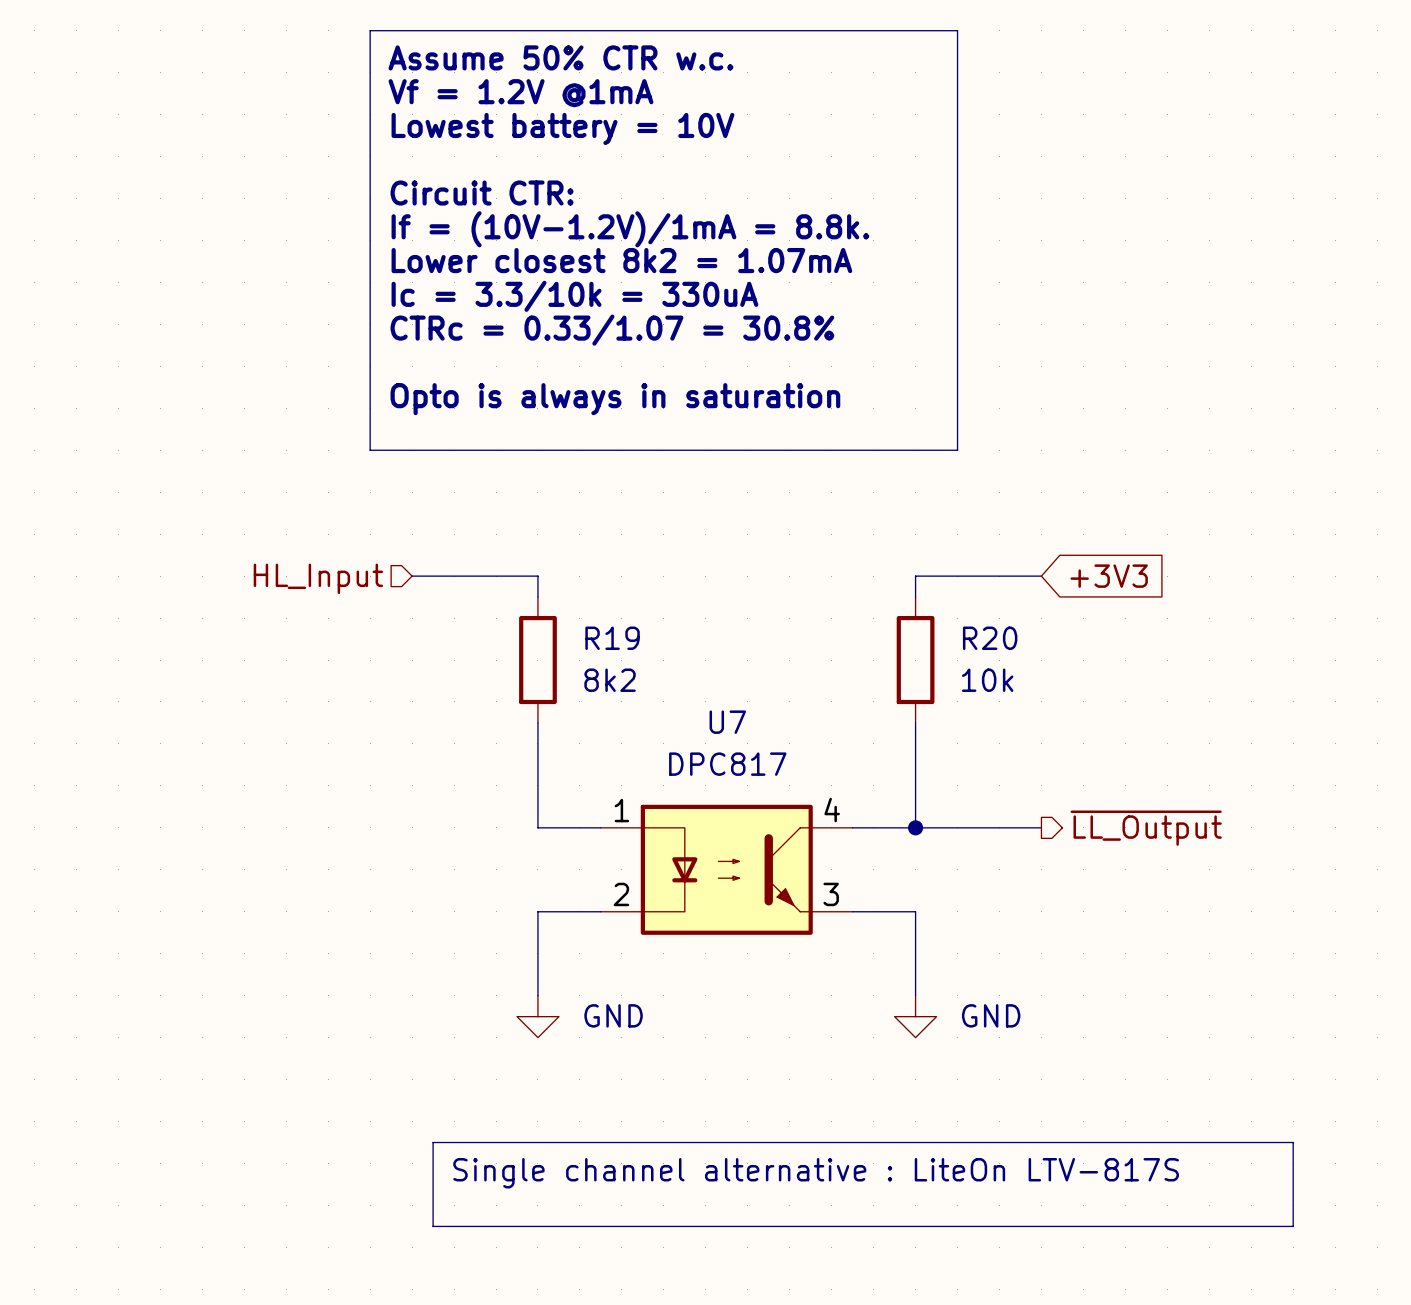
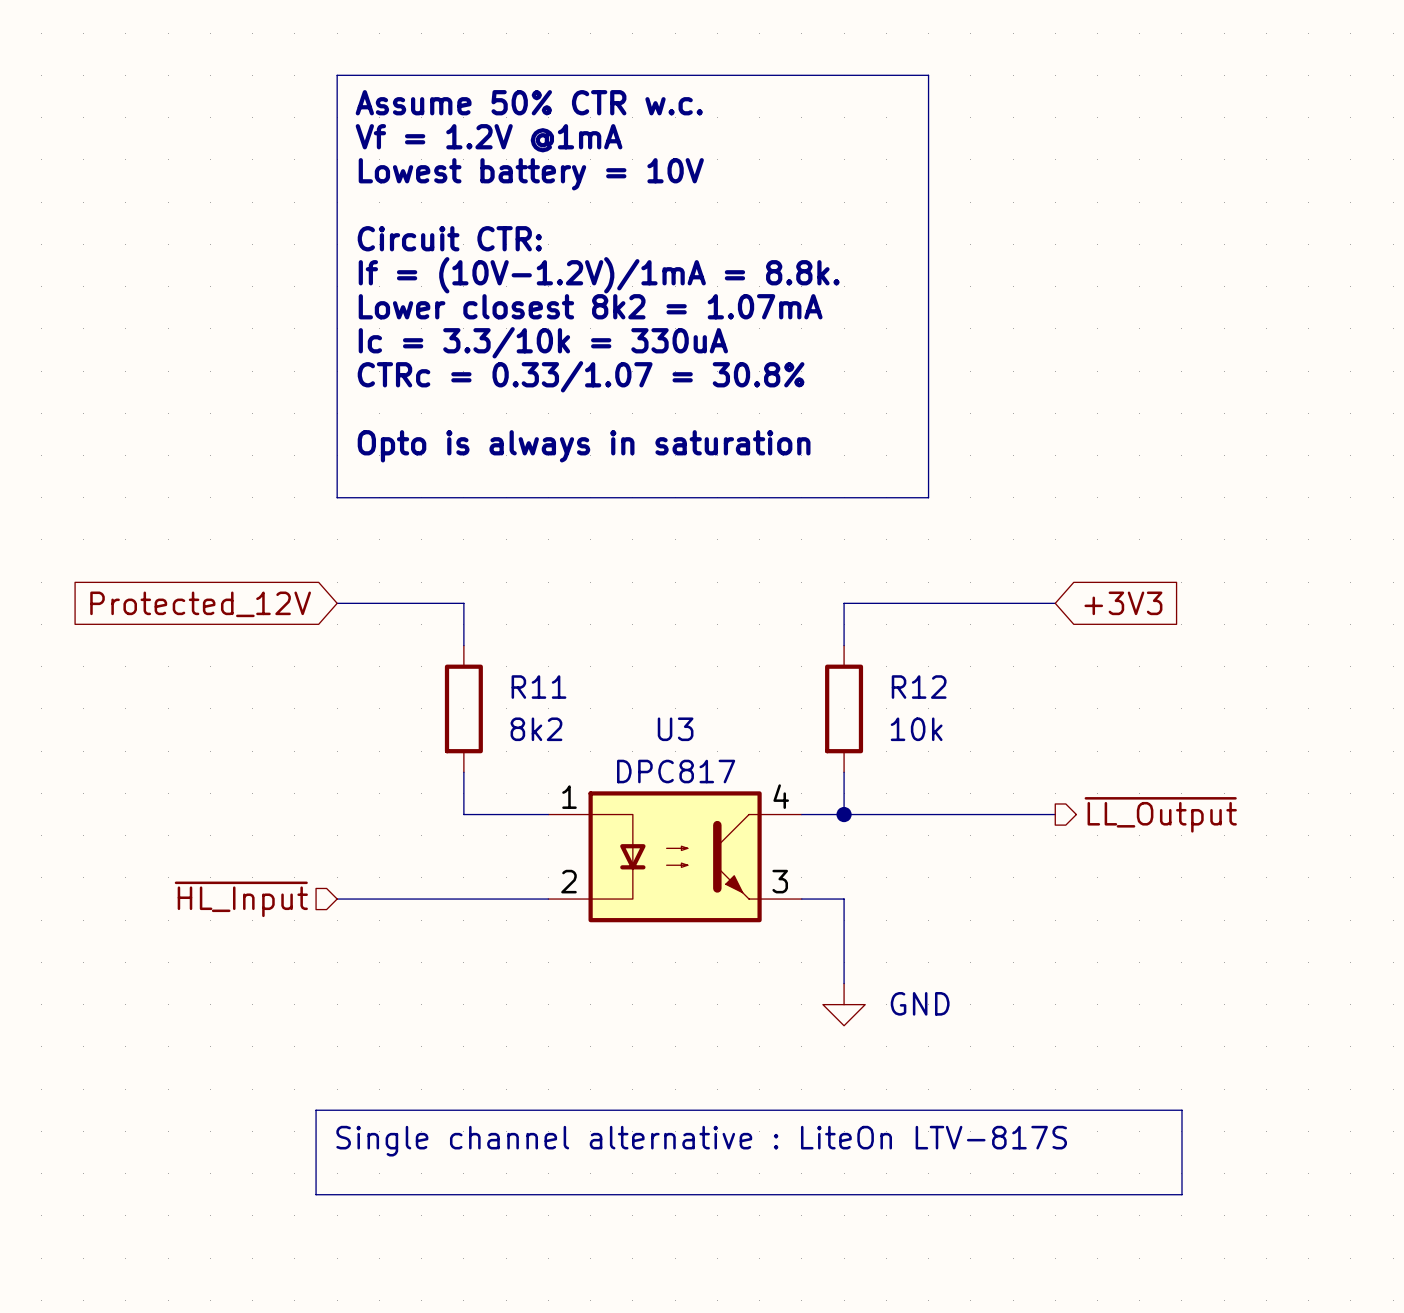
wire: none -> (337, 603) (463, 603) (463, 645)
wire: none -> (1055, 603) (844, 603) (844, 645)
global label: none -> Protected_12V (200, 604)
wire: (412, 576) (537, 576) (537, 597) -> none
wire: (1041, 576) (915, 576) (915, 597) -> none
global label position: +3V3 (1109, 576) -> +3V3 (1123, 603)
hierarchical label: HL_Input (318, 578) -> none
R11: none -> 8k2 (463, 708)
R19: 8k2 (537, 660) -> none
R12: none -> 10k (844, 708)
R20: 10k (915, 660) -> none
wire: none -> (463, 772) (463, 814) (548, 814)
wire: (537, 722) (537, 827) (600, 827) -> none
wire: none -> (844, 772) (844, 814)
wire: (915, 722) (915, 827) -> none
wire: none -> (801, 814) (1055, 814)
U3: none -> DPC817 (675, 856)
wire: (852, 827) (1041, 827) -> none
junction position: (915, 827) -> (844, 814)
hierarchical label position: ~{LL_Output} (1146, 828) -> ~{LL_Output} (1160, 814)
wire: none -> (337, 899) (548, 899)
wire: none -> (801, 899) (844, 899) (844, 983)
hierarchical label: none -> ~{HL_Input} (241, 899)
U7: DPC817 (726, 869) -> none
wire: (600, 911) (537, 911) (537, 995) -> none
wire: (852, 911) (915, 911) (915, 995) -> none
power symbol: GND (537, 1016) -> none
power symbol position: GND (915, 1016) -> GND (844, 1004)
line: (433, 1142) (433, 1226) (1293, 1226) (1293, 1142) (1209, 1142) -> (400, 1194) (316, 1194) (316, 1110) (1181, 1110) (1181, 1194)
text position: Single channel alternative : LiteOn LTV-817S (816, 1173) -> Single channel alternative : LiteOn LTV-817S (701, 1141)

